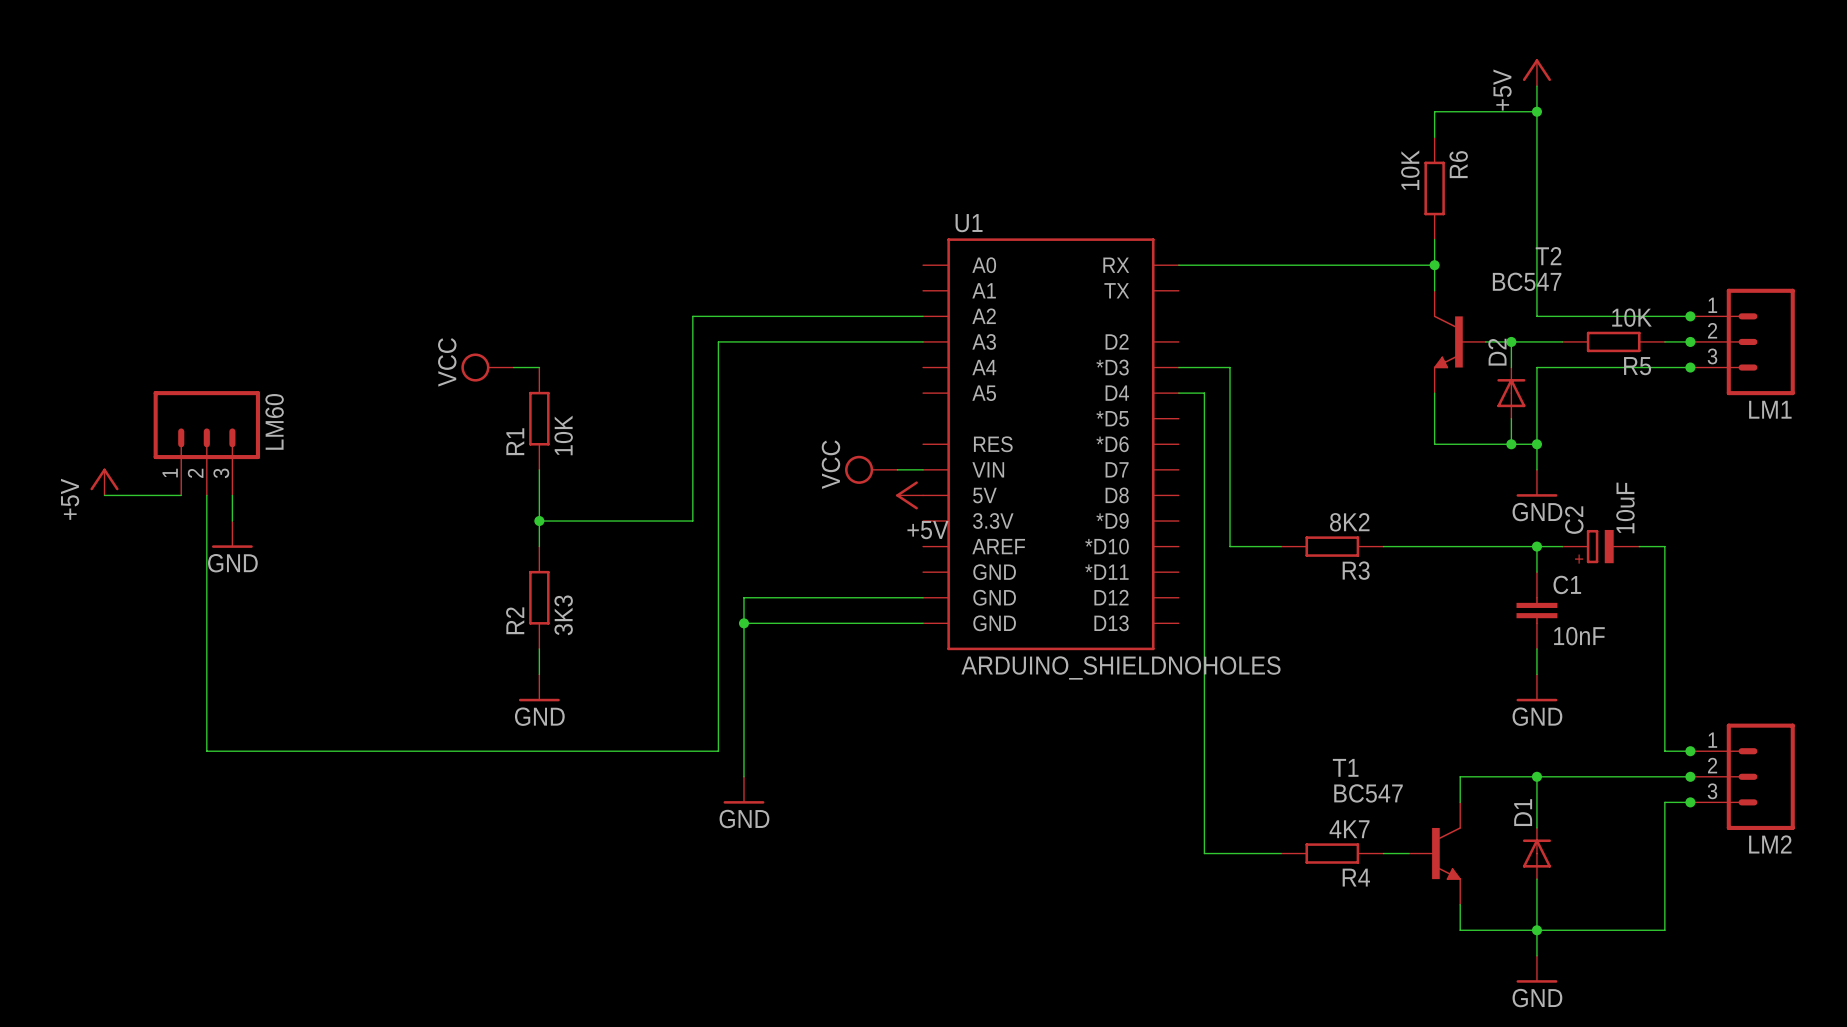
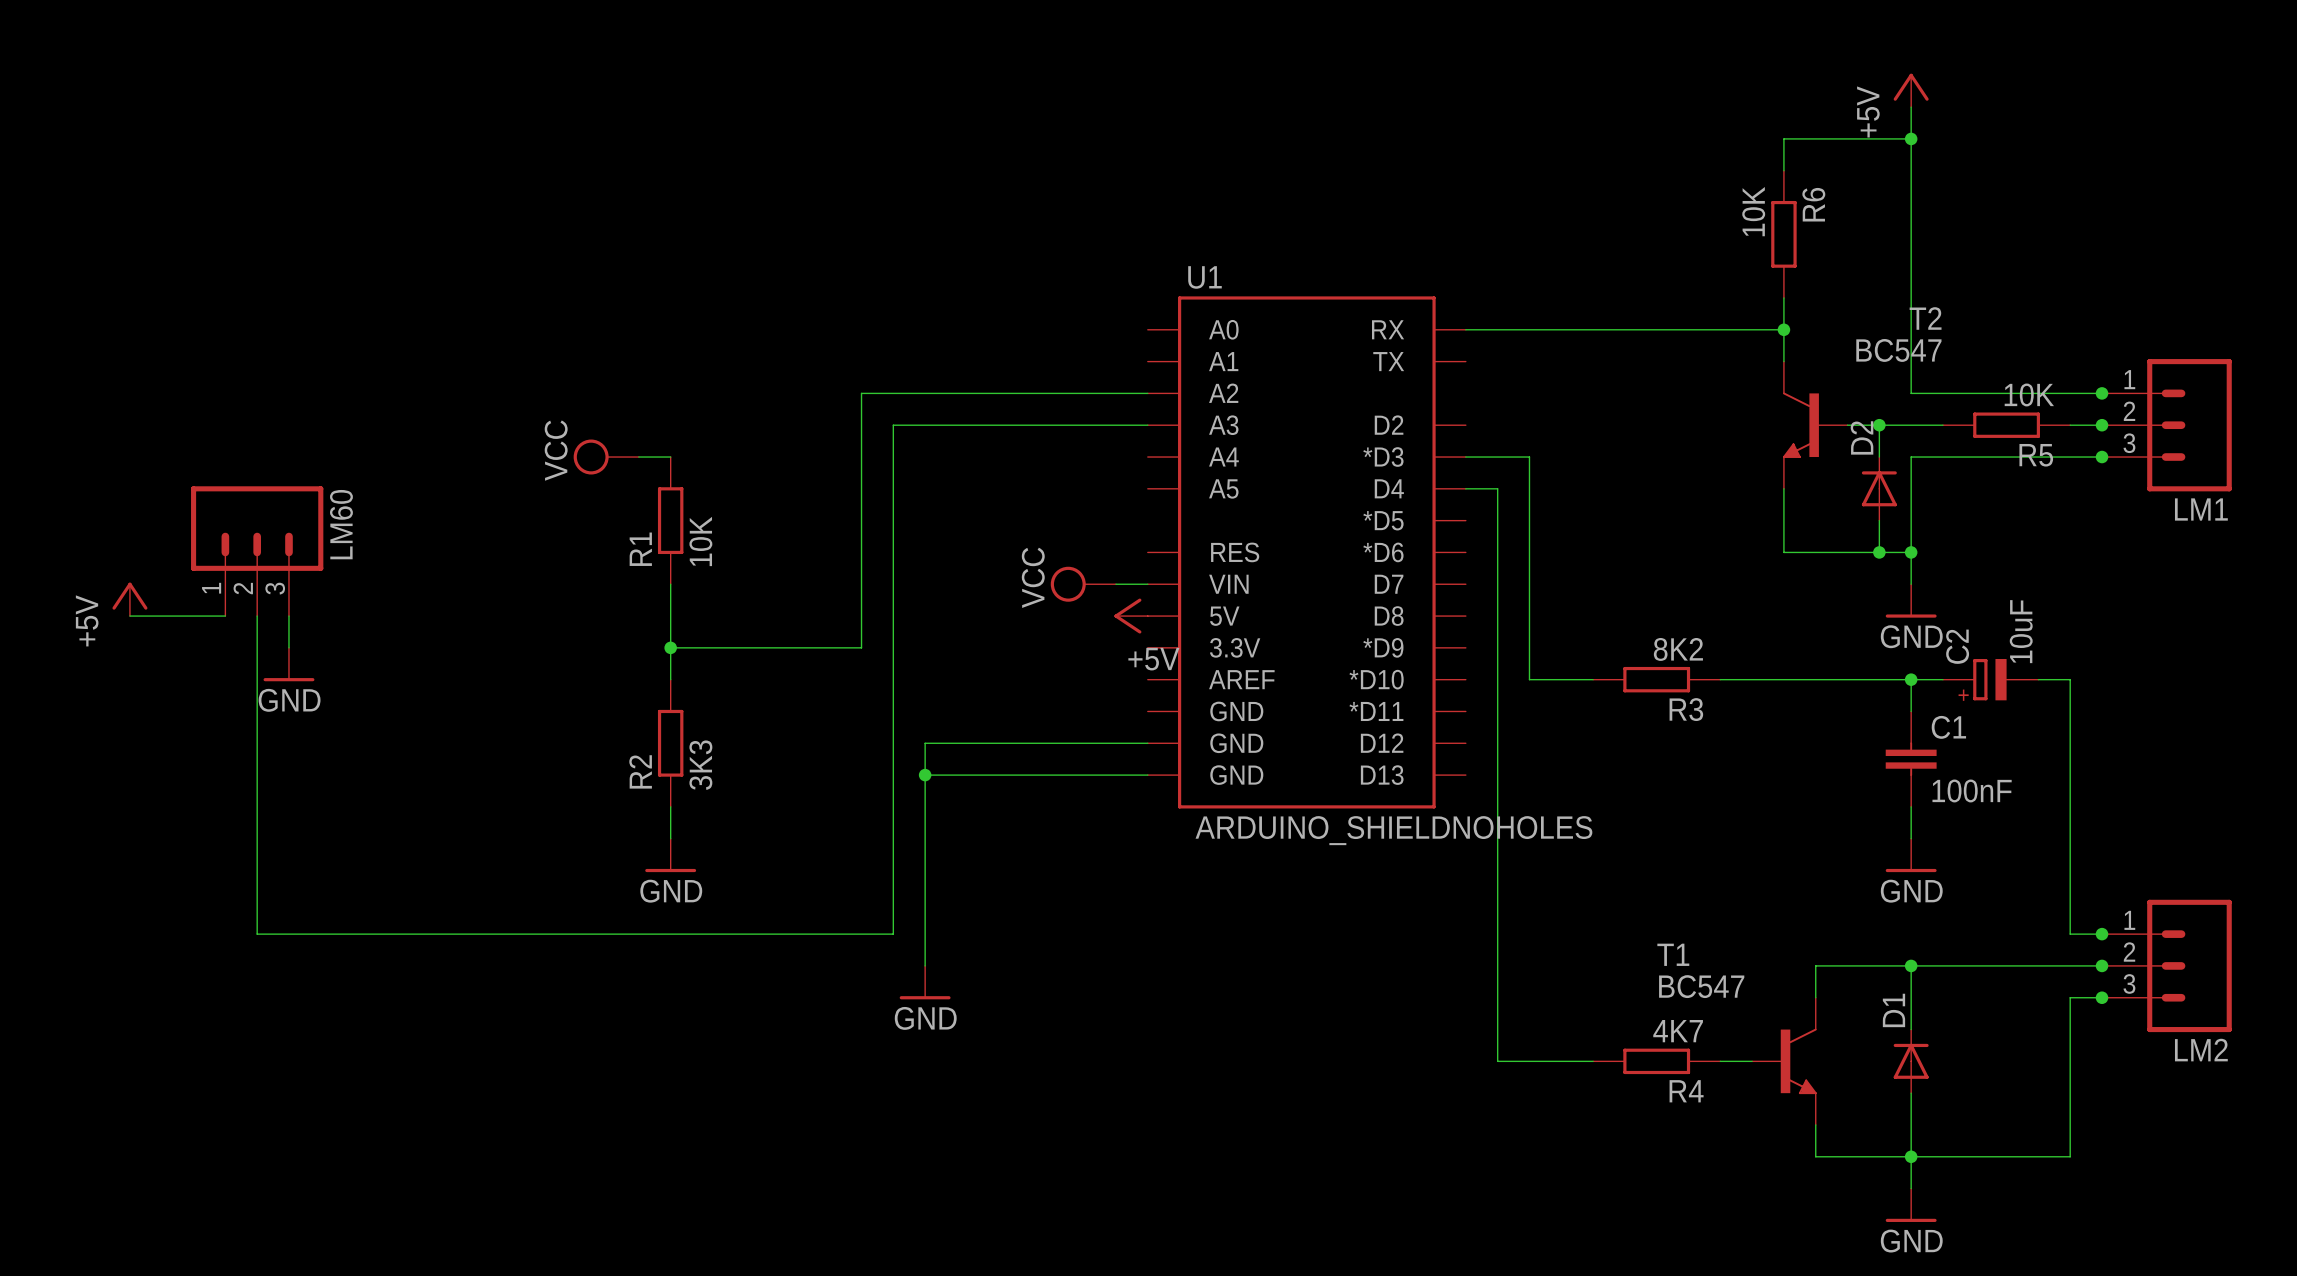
C1 value: 10nF (1579, 636) -> 100nF (1972, 790)

